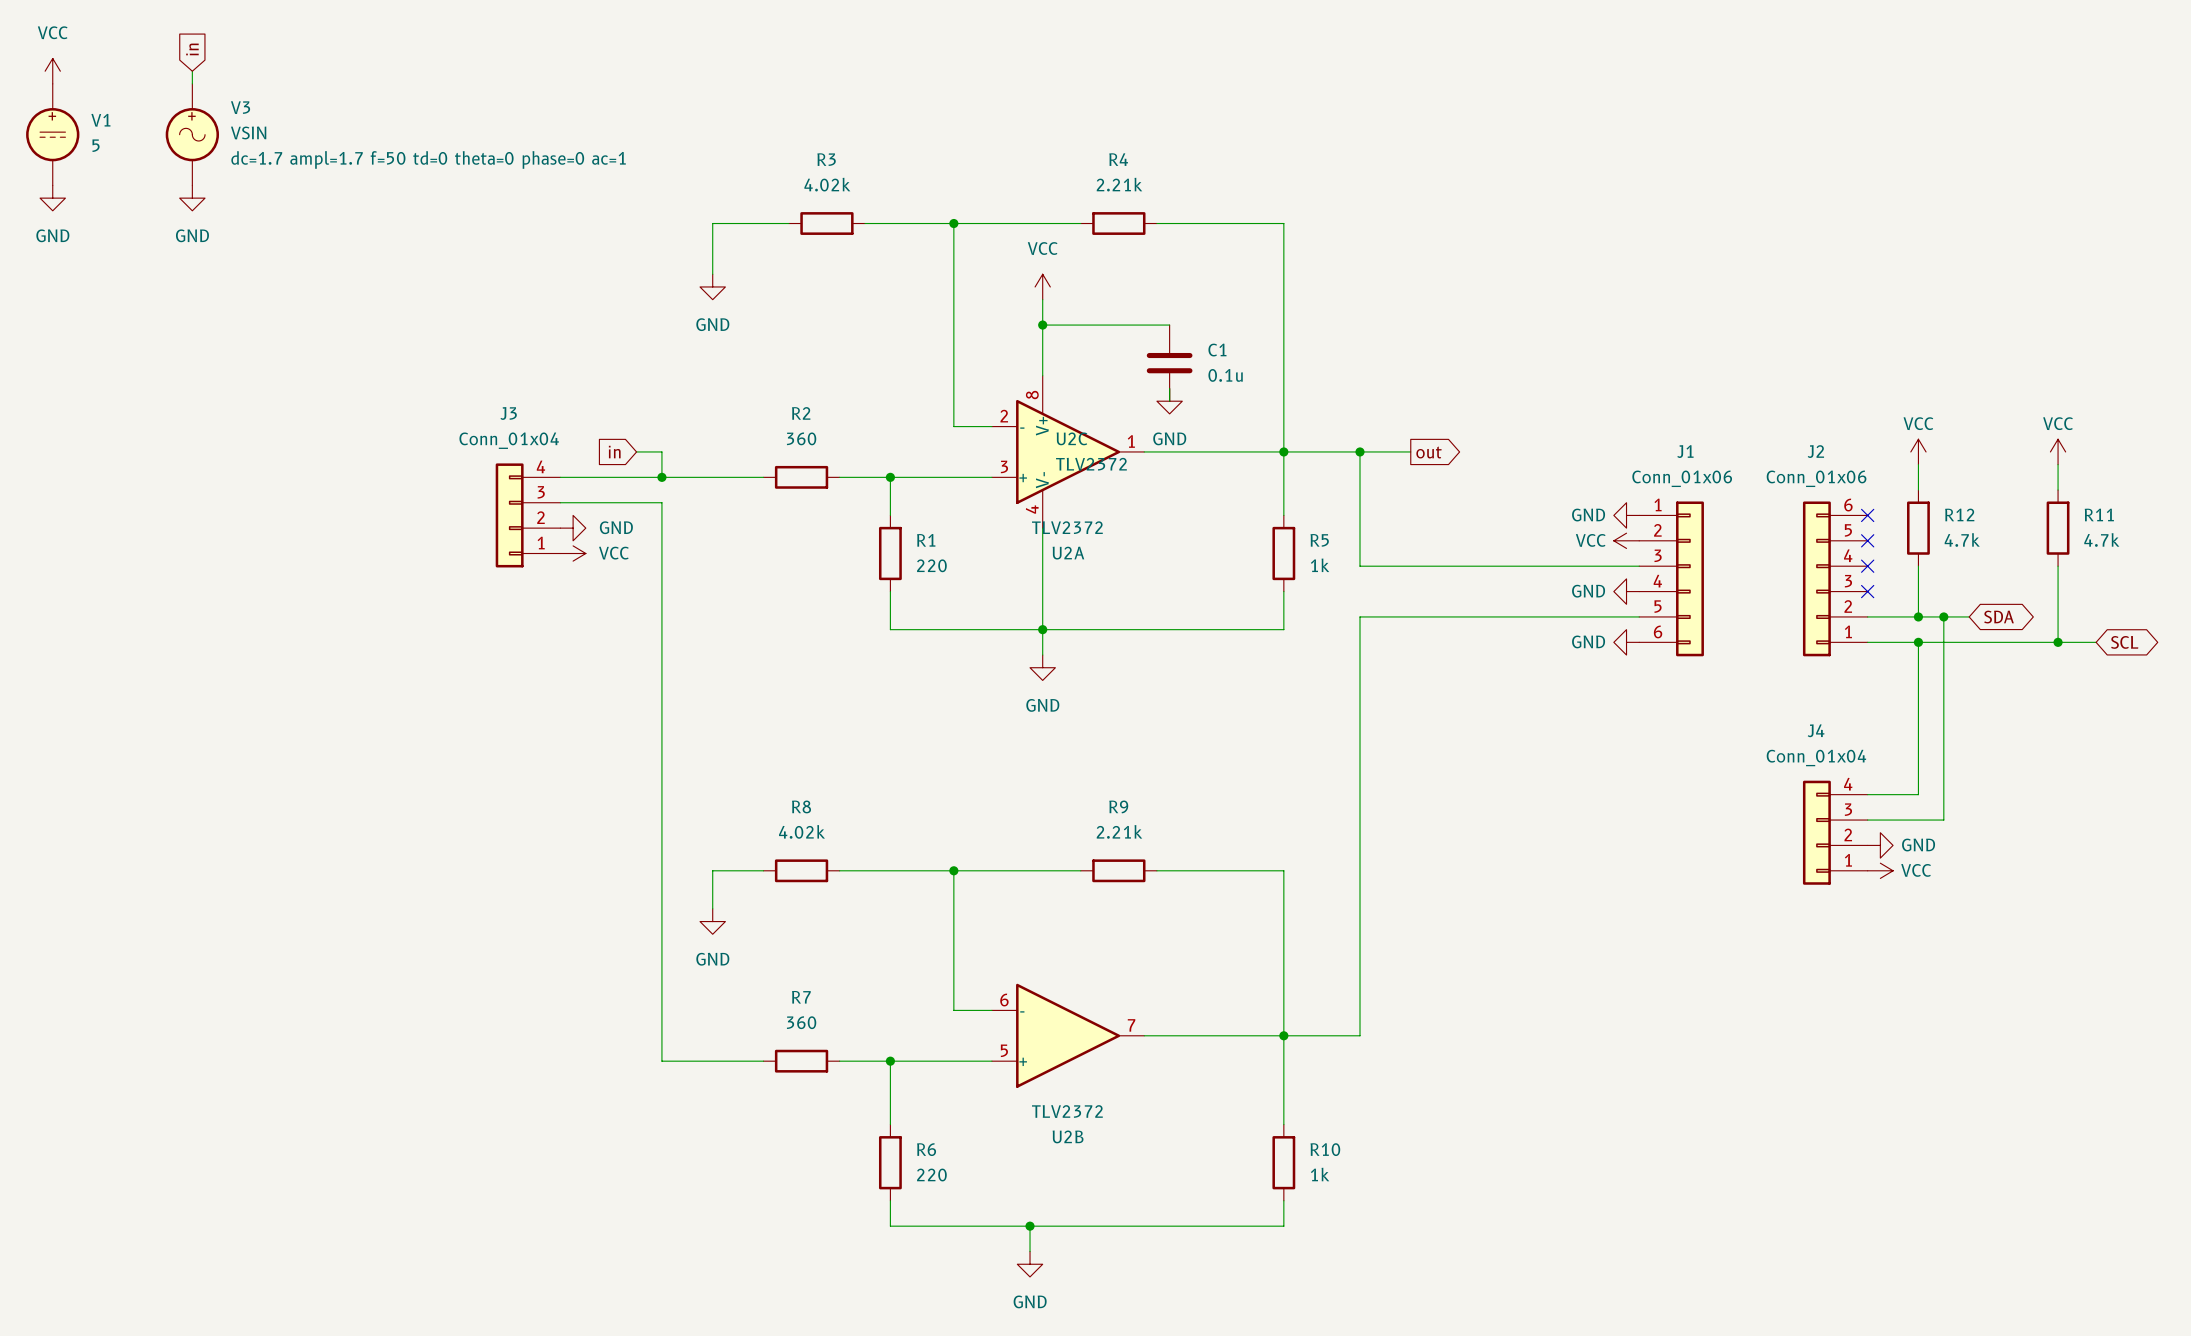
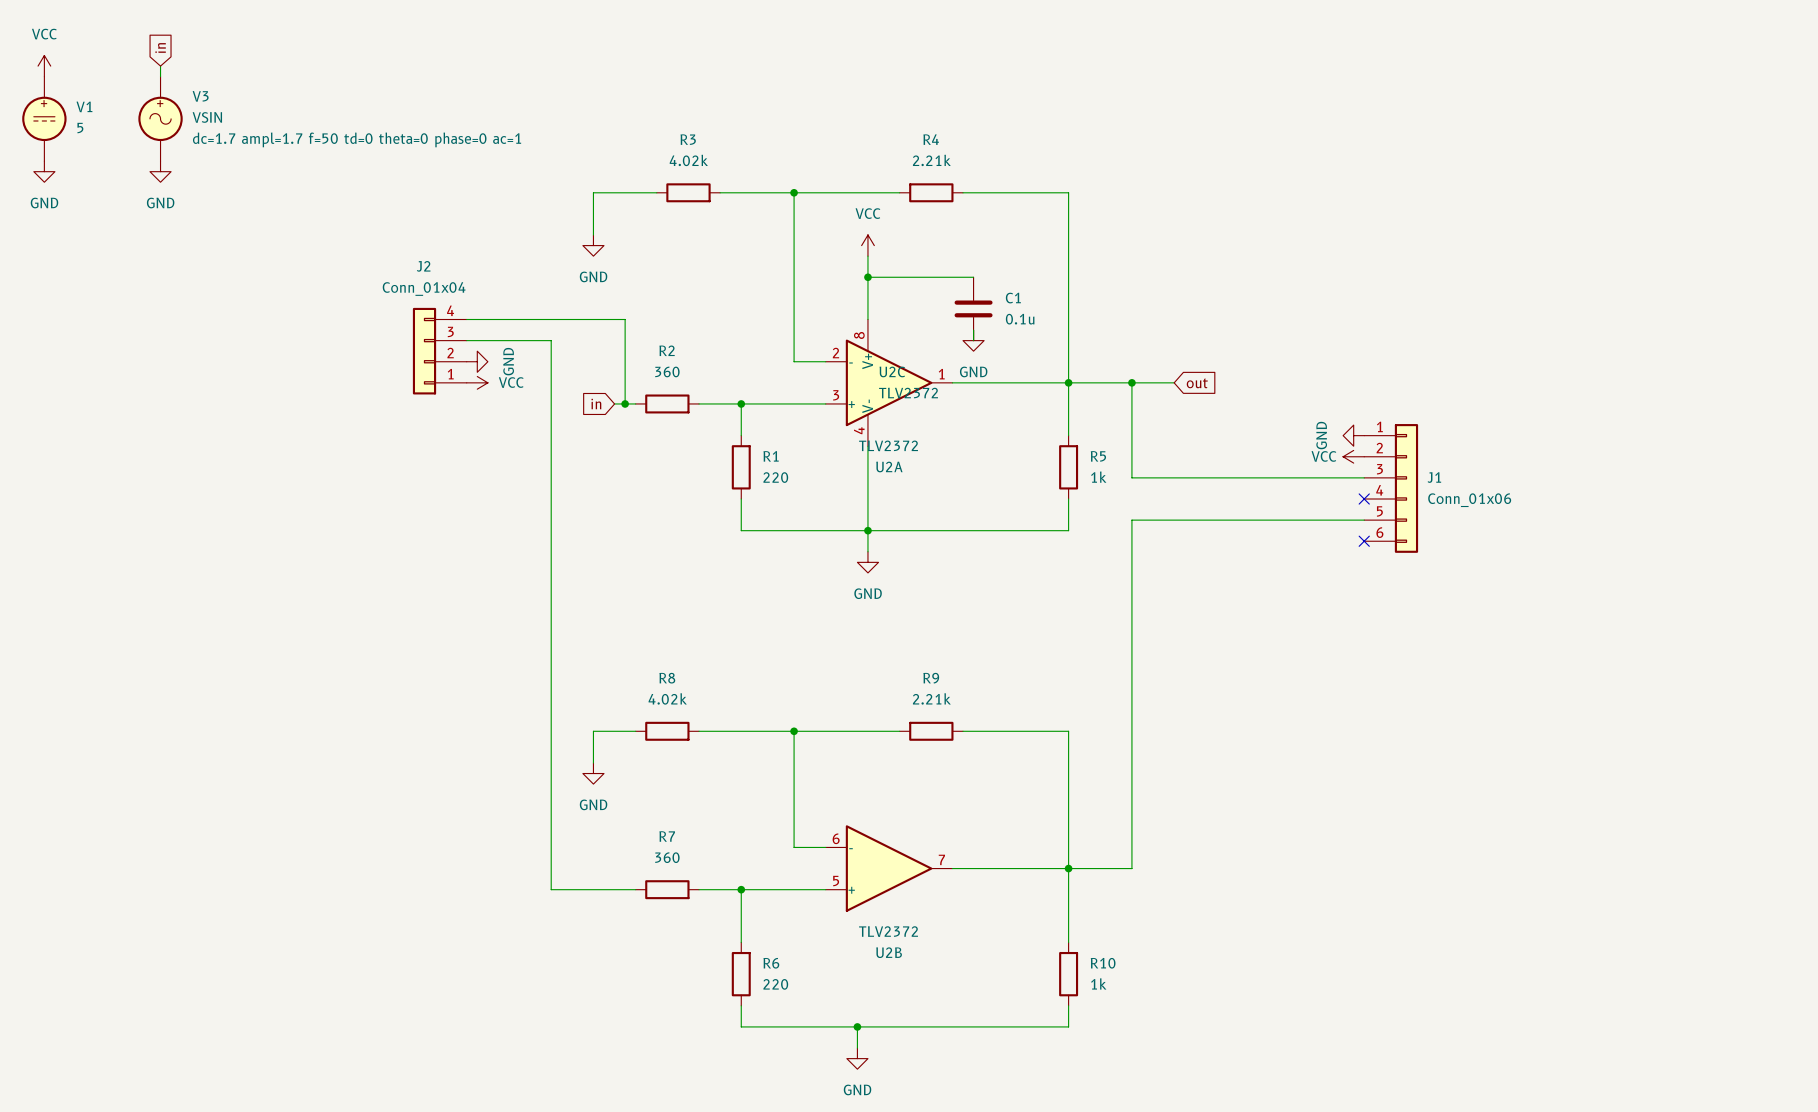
wire: none -> (466, 319) (625, 319) (625, 403)
wire: (636, 451) (661, 451) -> (466, 340) (551, 340) (551, 382)
J1 name position: J1 (1685, 451) -> J1 (1434, 477)
J2 name position: J2 (1815, 451) -> J2 (423, 266)
power symbol: VCC (1918, 451) -> none
power symbol: VCC (2058, 451) -> none
global label position: in (614, 452) -> in (596, 404)
global label shape: output (1428, 452) -> input (1197, 383)
wire: (1918, 464) (1918, 490) -> none
wire: (2058, 464) (2058, 490) -> none
wire: (560, 477) (738, 477) -> none
junction: (661, 477) -> none
junction: none -> (625, 403)
J1 value position: Conn_01x06 (1682, 478) -> Conn_01x06 (1469, 500)
J2 value: Conn_01x06 (1816, 478) -> Conn_01x04 (424, 289)
J2 symbol: [1802, 501, 1868, 657] -> [412, 307, 467, 395]
wire: (560, 502) (661, 502) -> (551, 403) (551, 425)
J3: Conn_01x04 (528, 515) -> none
power symbol text rotation: 0° (1588, 515) -> 90° counterclockwise (1321, 435)
no-connect mark: (1867, 515) -> none
power symbol text rotation: 0° (616, 527) -> 90° counterclockwise (508, 361)
power symbol position: GND (573, 528) -> GND (477, 361)
R12: 4.7k (1918, 528) -> none
R11: 4.7k (2058, 528) -> none
no-connect mark: (1867, 540) -> none
power symbol position: VCC (573, 553) -> VCC (477, 382)
no-connect mark: (1867, 566) -> none
wire: (1918, 566) (1918, 616) -> none
wire: (2058, 566) (2058, 642) -> none
power symbol: GND (1626, 591) -> none
no-connect mark: none -> (1364, 499)
no-connect mark: (1867, 591) -> none
wire: (1867, 616) (1969, 616) -> none
junction: (1918, 616) -> none
wire: (1943, 616) (1943, 820) (1867, 820) -> none
junction: (1943, 616) -> none
global label: SDA (1999, 617) -> none
power symbol: GND (1626, 642) -> none
no-connect mark: none -> (1364, 541)
wire: (1867, 642) (2096, 642) -> none
wire: (1918, 642) (1918, 794) (1867, 794) -> none
junction: (1918, 642) -> none
junction: (2058, 642) -> none
global label: SCL (2124, 642) -> none
J4: Conn_01x04 (1835, 832) -> none
power symbol: GND (1880, 845) -> none
power symbol: VCC (1880, 870) -> none

